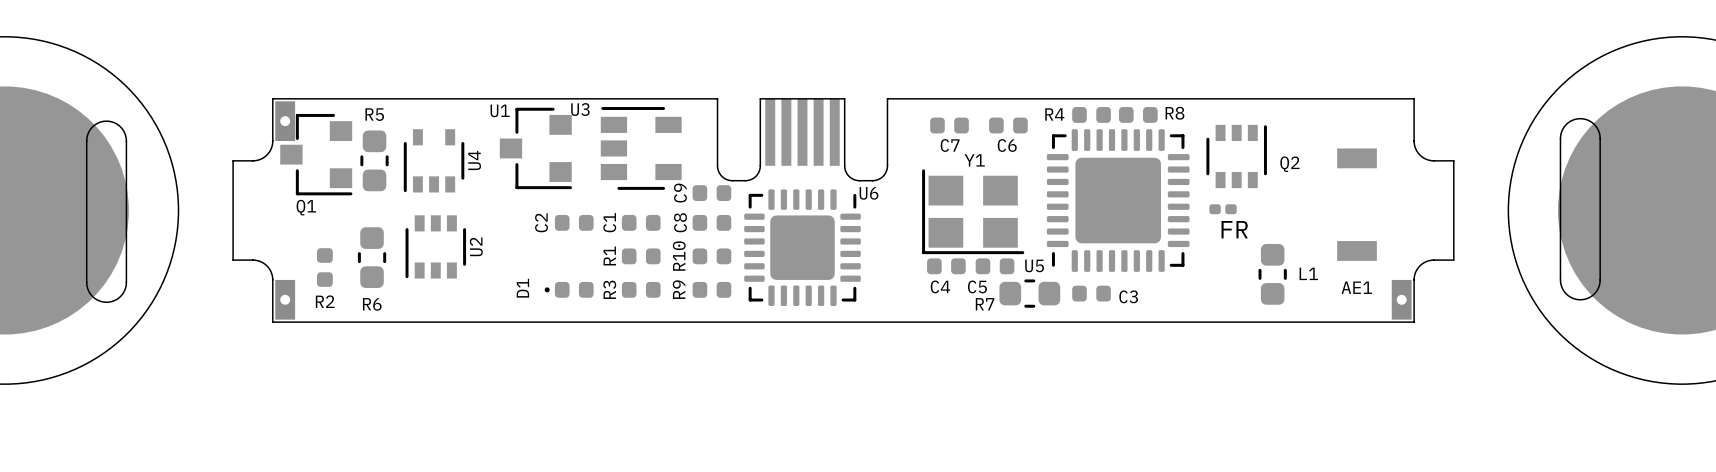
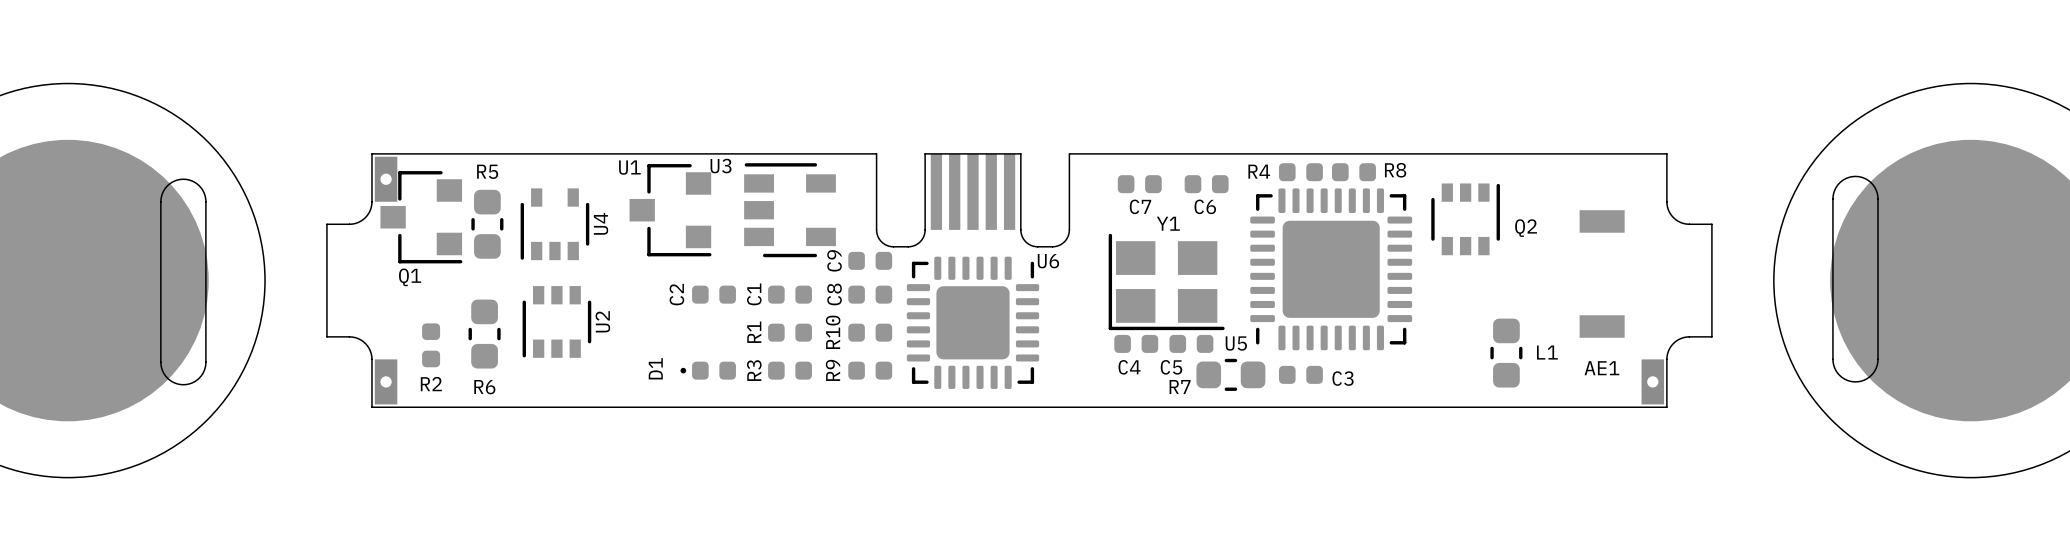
FR: (1223, 209) -> none

